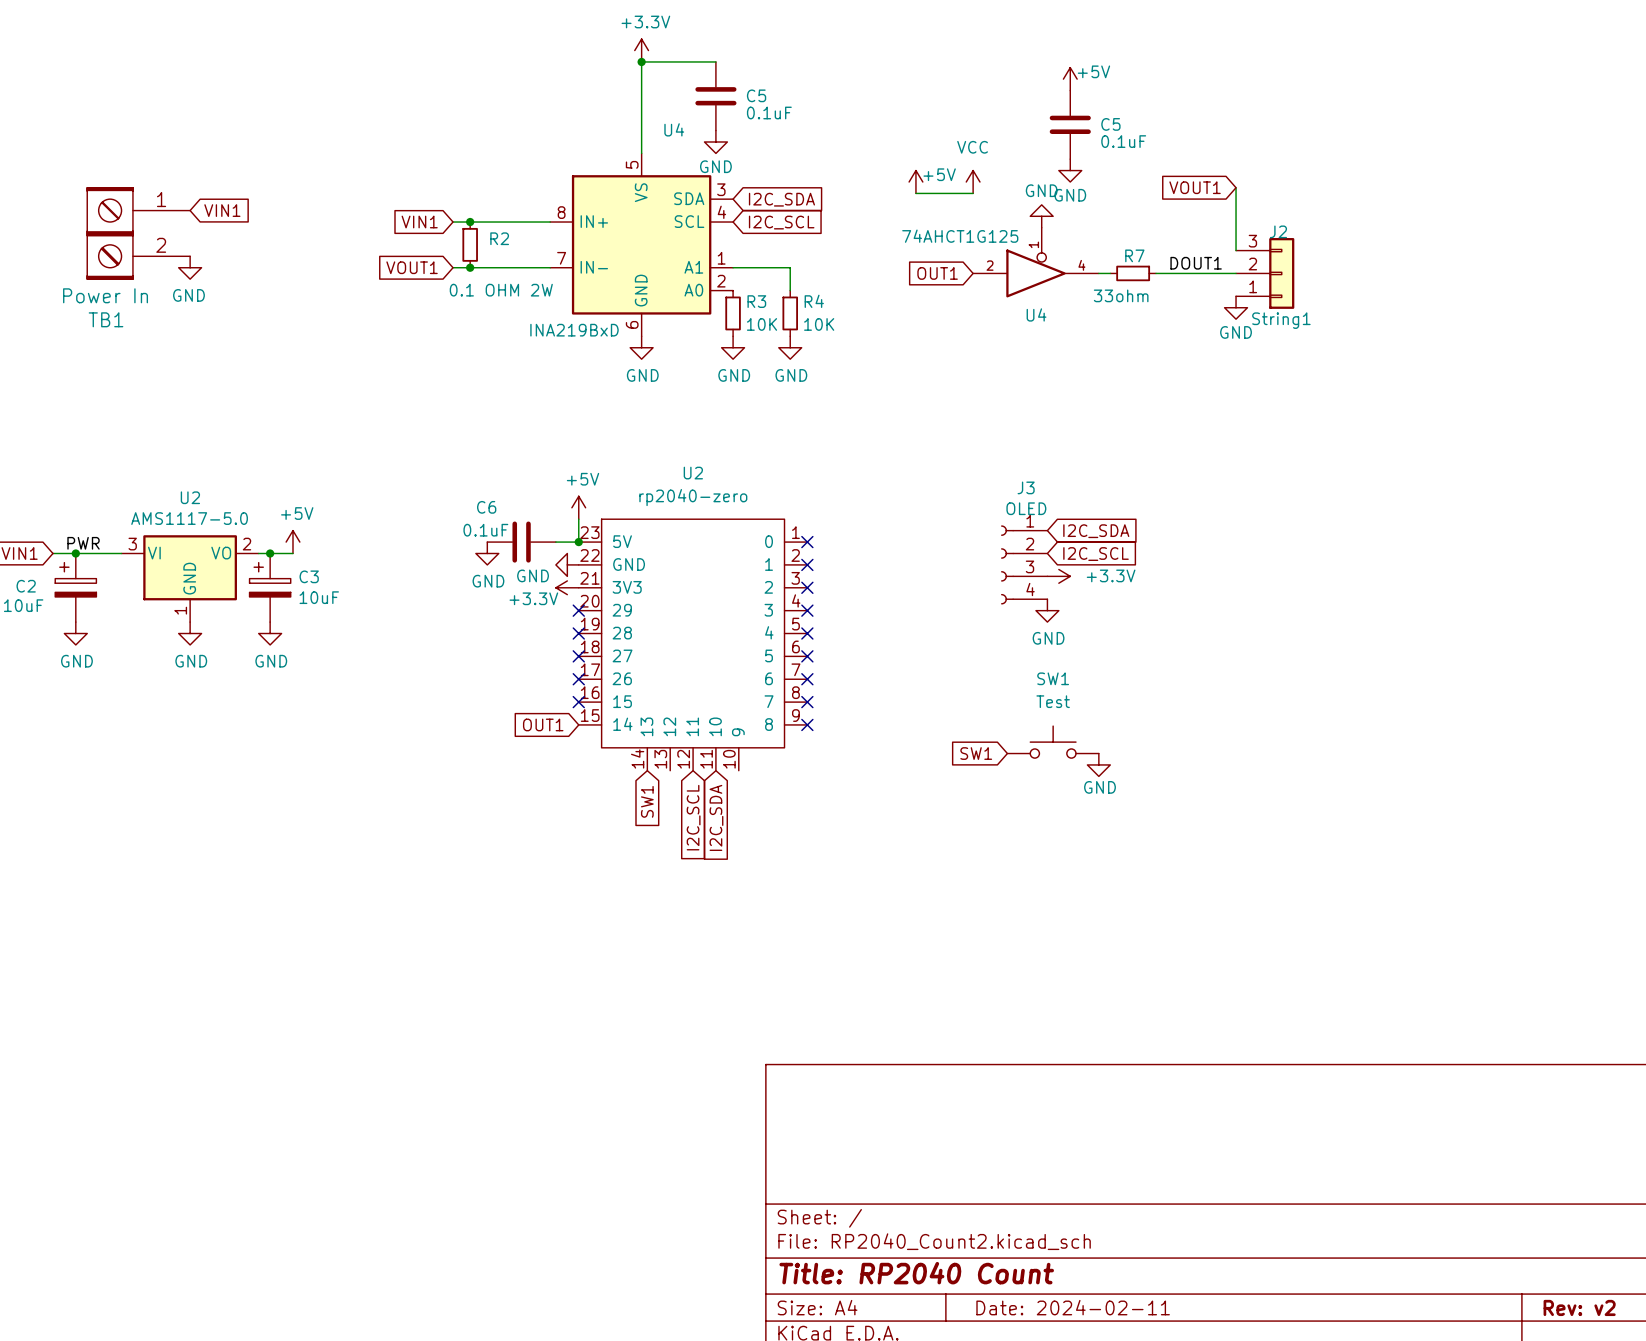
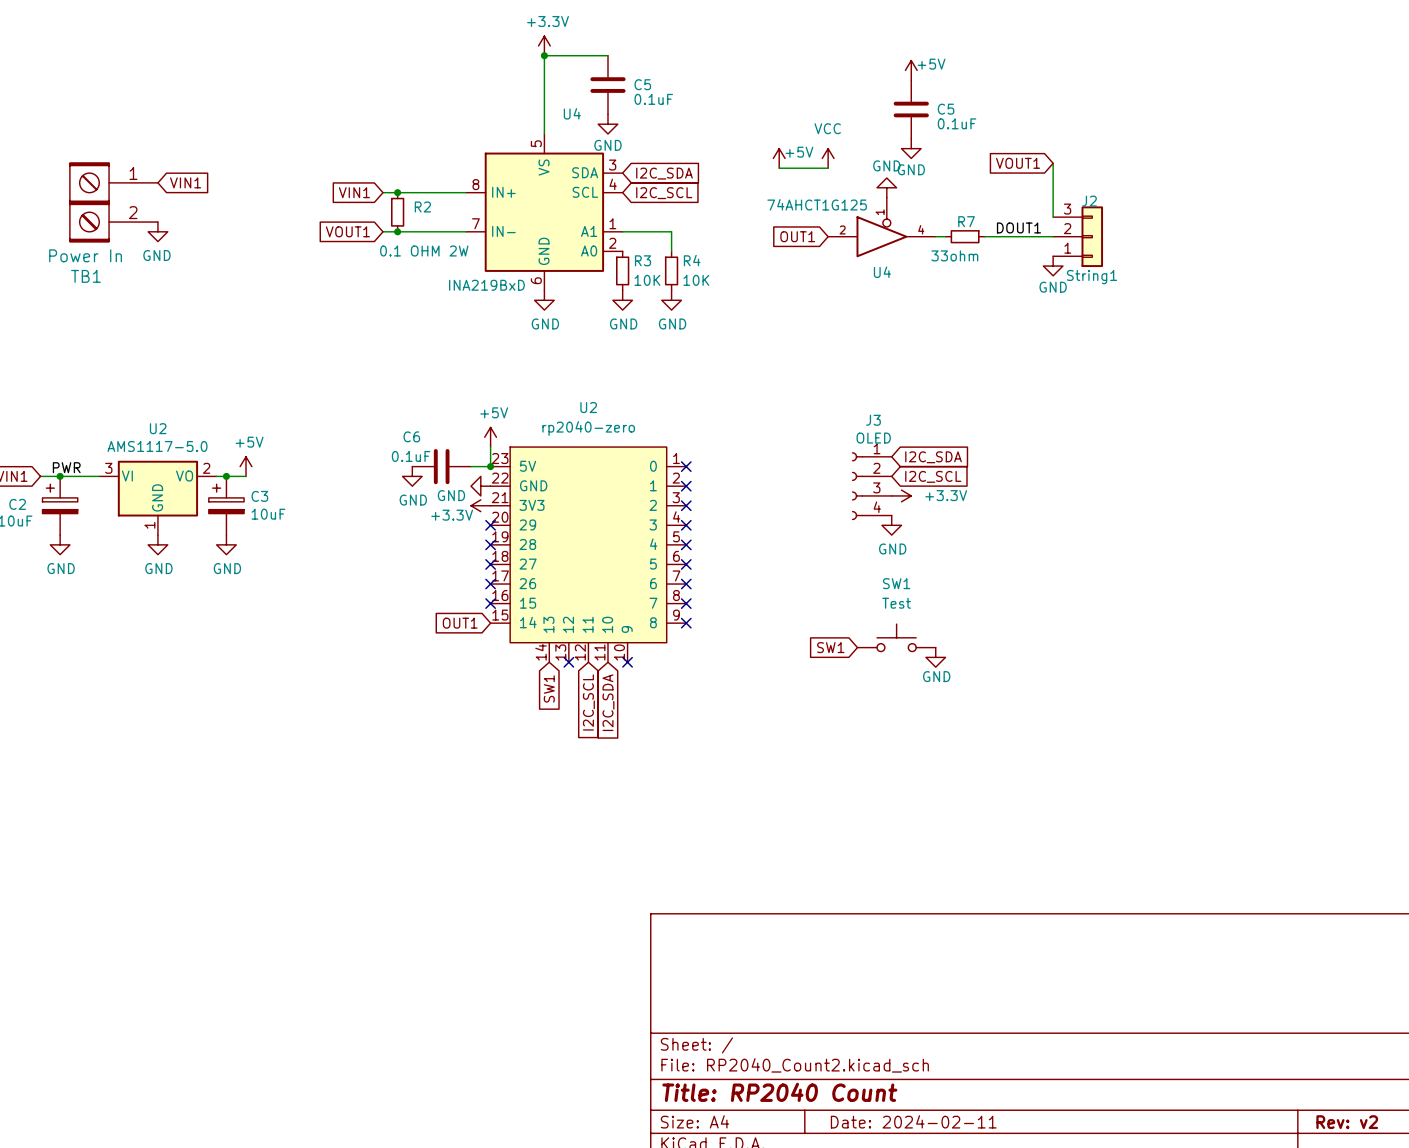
U2 symbol: [578, 519, 808, 771] -> [490, 447, 687, 663]
no-connect mark: none -> (568, 662)
no-connect mark: none -> (627, 662)

